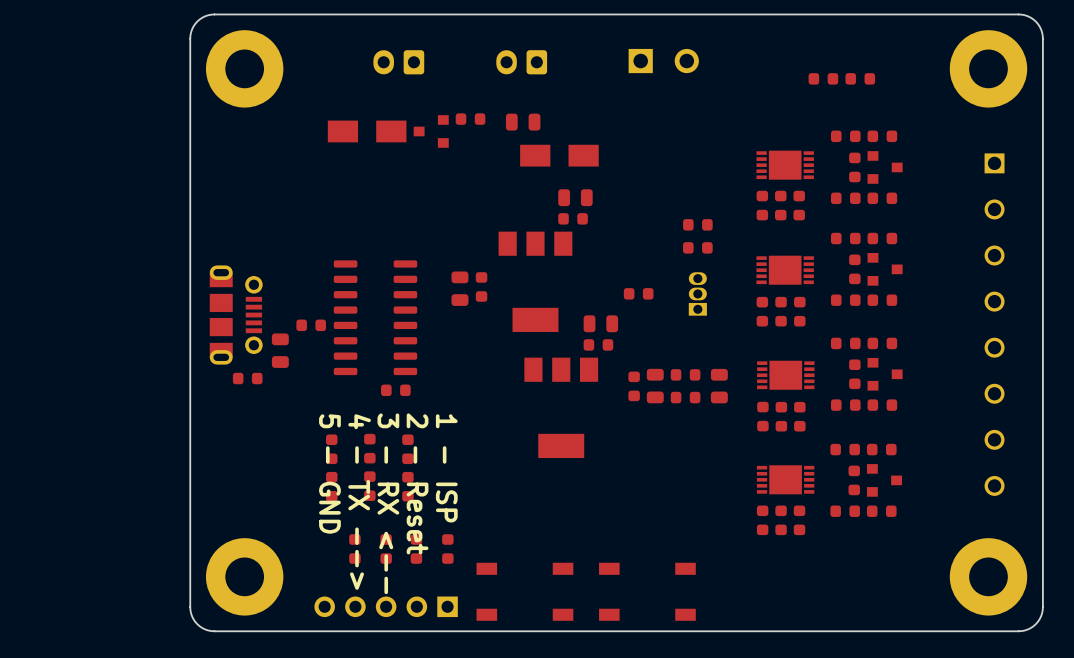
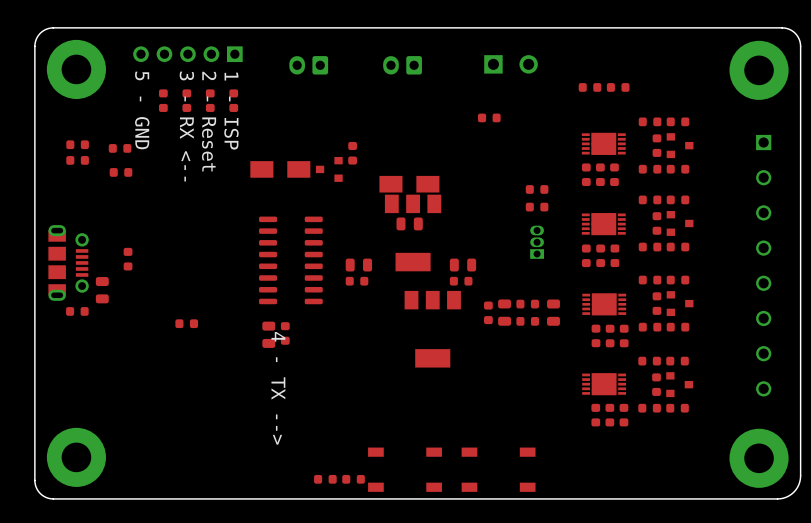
board edge: (1042, 38) (1041, 29) (1035, 21) (1027, 16) (1018, 14) (214, 14) (202, 17) (193, 26) (190, 38) (190, 607) (192, 616) (197, 624) (205, 629) (214, 631) (1018, 631) (1027, 629) (1037, 621) (1042, 613) (1042, 599) -> (800, 47) (799, 39) (795, 33) (782, 27) (53, 27) (44, 30) (37, 37) (34, 46) (34, 480) (40, 493) (53, 498) (777, 498) (786, 497) (793, 492) (798, 484) (800, 475)
part: none -> (187, 54)
part position: (244, 68) -> (76, 69)
part position: (823, 78) -> (618, 87)
part: (860, 78) -> none
part: none -> (590, 87)
part: none -> (163, 100)
part: none -> (186, 100)
part: none -> (210, 100)
part: none -> (233, 100)
part: (470, 119) -> none
part: (523, 122) -> none
text: none -> 1 - ISP (231, 111)
part position: (367, 131) -> (280, 169)
part position: (431, 131) -> (329, 169)
part: none -> (489, 117)
text: none -> 5 - GND (142, 110)
text: none -> 2 - Reset (209, 121)
part position: (559, 155) -> (409, 184)
text: none -> 3 - RX <-- (186, 126)
part: none -> (77, 144)
part: none -> (120, 148)
part: none -> (352, 153)
part: none -> (77, 160)
part: (575, 197) -> none
part: none -> (121, 172)
part: (573, 218) -> none
part: none -> (409, 223)
part: (481, 286) -> none
part rotation: 0° (459, 288) -> 90° clockwise (358, 265)
part position: (459, 288) -> (358, 265)
part: (638, 293) -> none
part position: (236, 315) -> (68, 262)
part: none -> (128, 259)
part: (311, 325) -> none
part: none -> (357, 281)
part: (280, 350) -> none
part: none -> (102, 290)
part position: (247, 378) -> (186, 323)
part: none -> (77, 311)
part: (395, 390) -> none
part: none -> (285, 333)
part: none -> (268, 334)
part: (762, 416) -> none
part: none -> (596, 335)
part: (781, 416) -> none
part: none -> (610, 336)
part: (799, 416) -> none
part: none -> (624, 336)
part: (369, 448) -> none
part: (331, 449) -> none
part: (407, 449) -> none
text: 1 - ISP (446, 468) -> none
text: 5 - GND (329, 473) -> none
text: 2 - Reset (417, 483) -> none
part: (331, 486) -> none
part: (369, 486) -> none
part: (407, 486) -> none
text: 3 - RX <-- (388, 503) -> none
part: (762, 520) -> none
part: none -> (595, 415)
part: (781, 520) -> none
part: none -> (609, 415)
part: (799, 520) -> none
part: none -> (623, 415)
part: (354, 549) -> none
part: (386, 549) -> none
part: (416, 549) -> none
part: (447, 549) -> none
part position: (244, 576) -> (76, 457)
part: none -> (325, 479)
part: none -> (353, 479)
part: (386, 606) -> none

